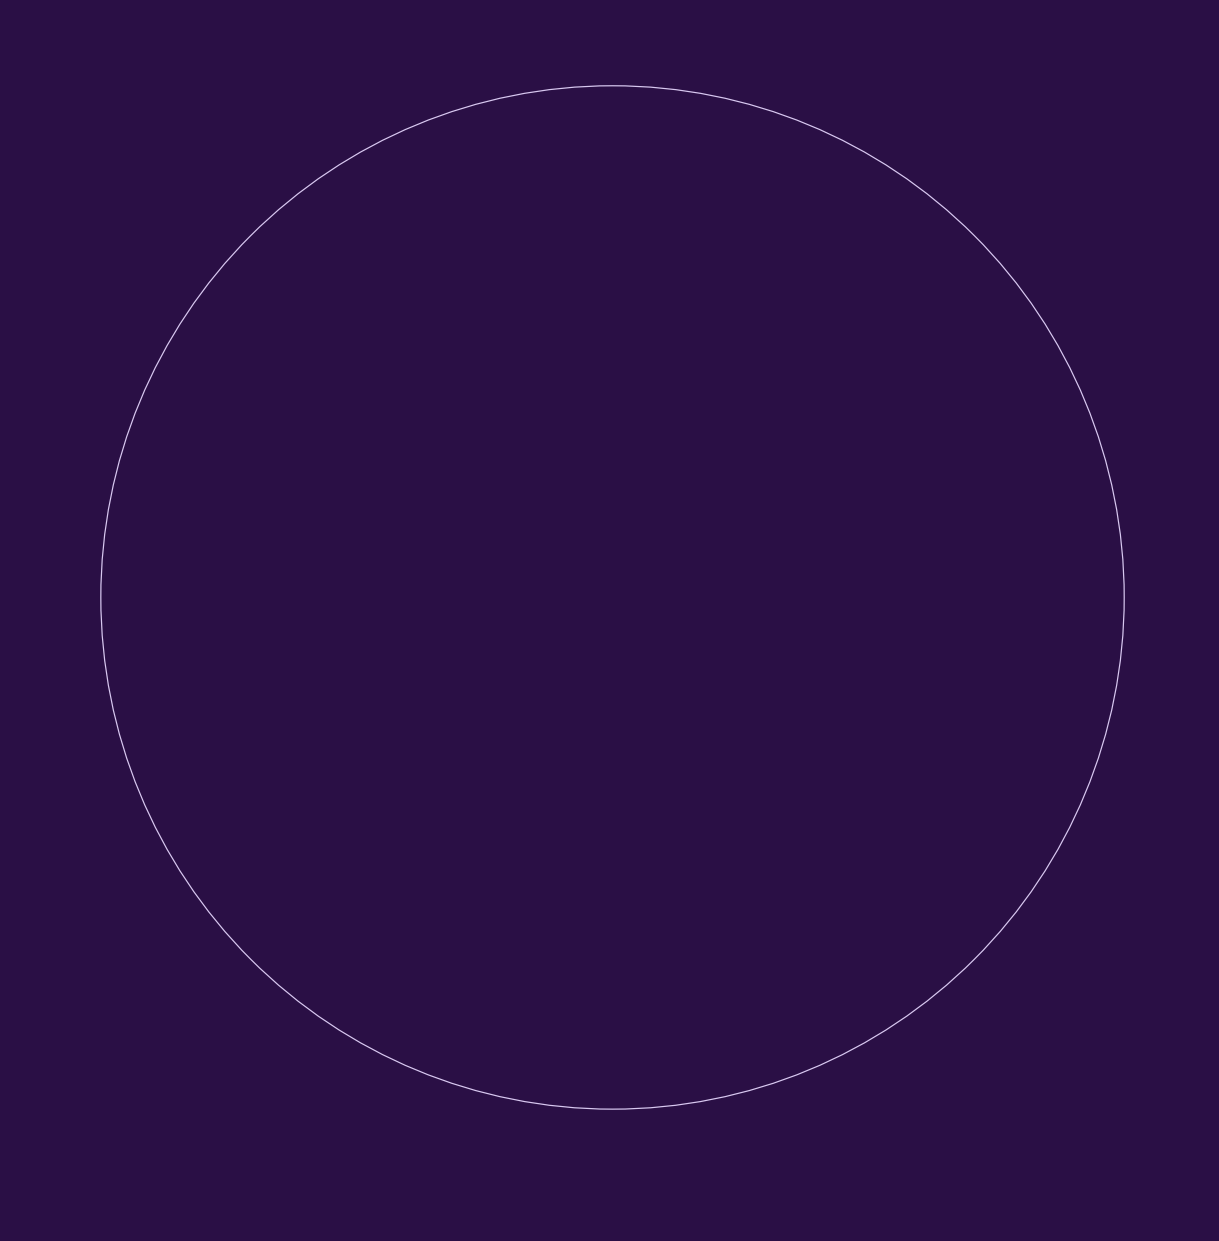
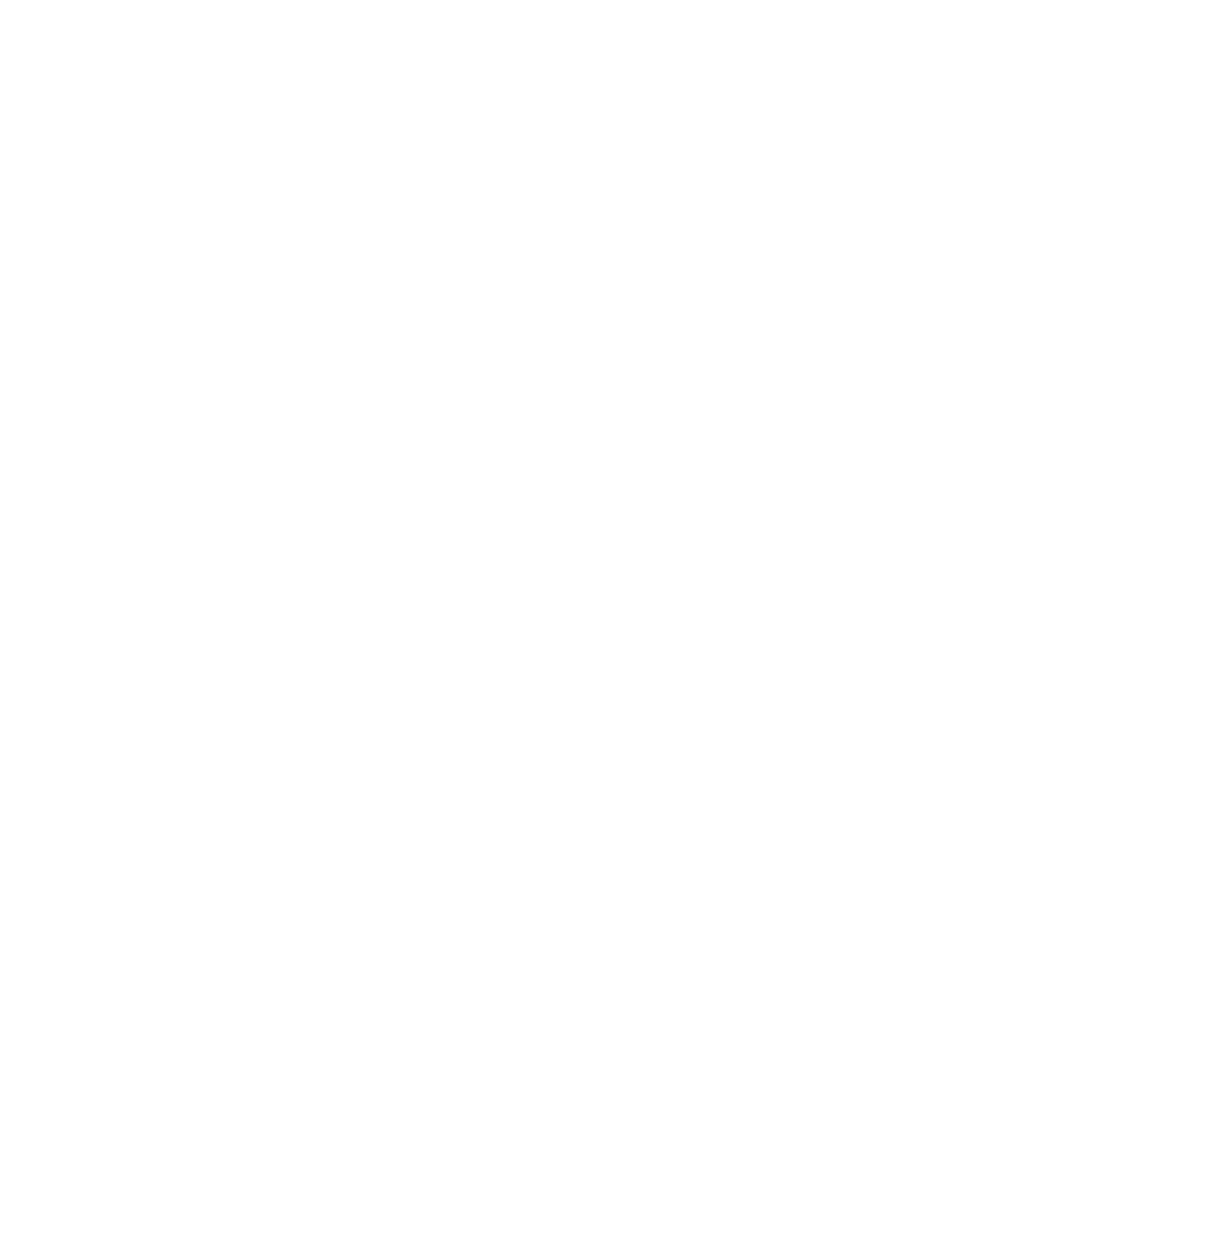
round board edge: [100, 85, 1125, 1110] -> none

